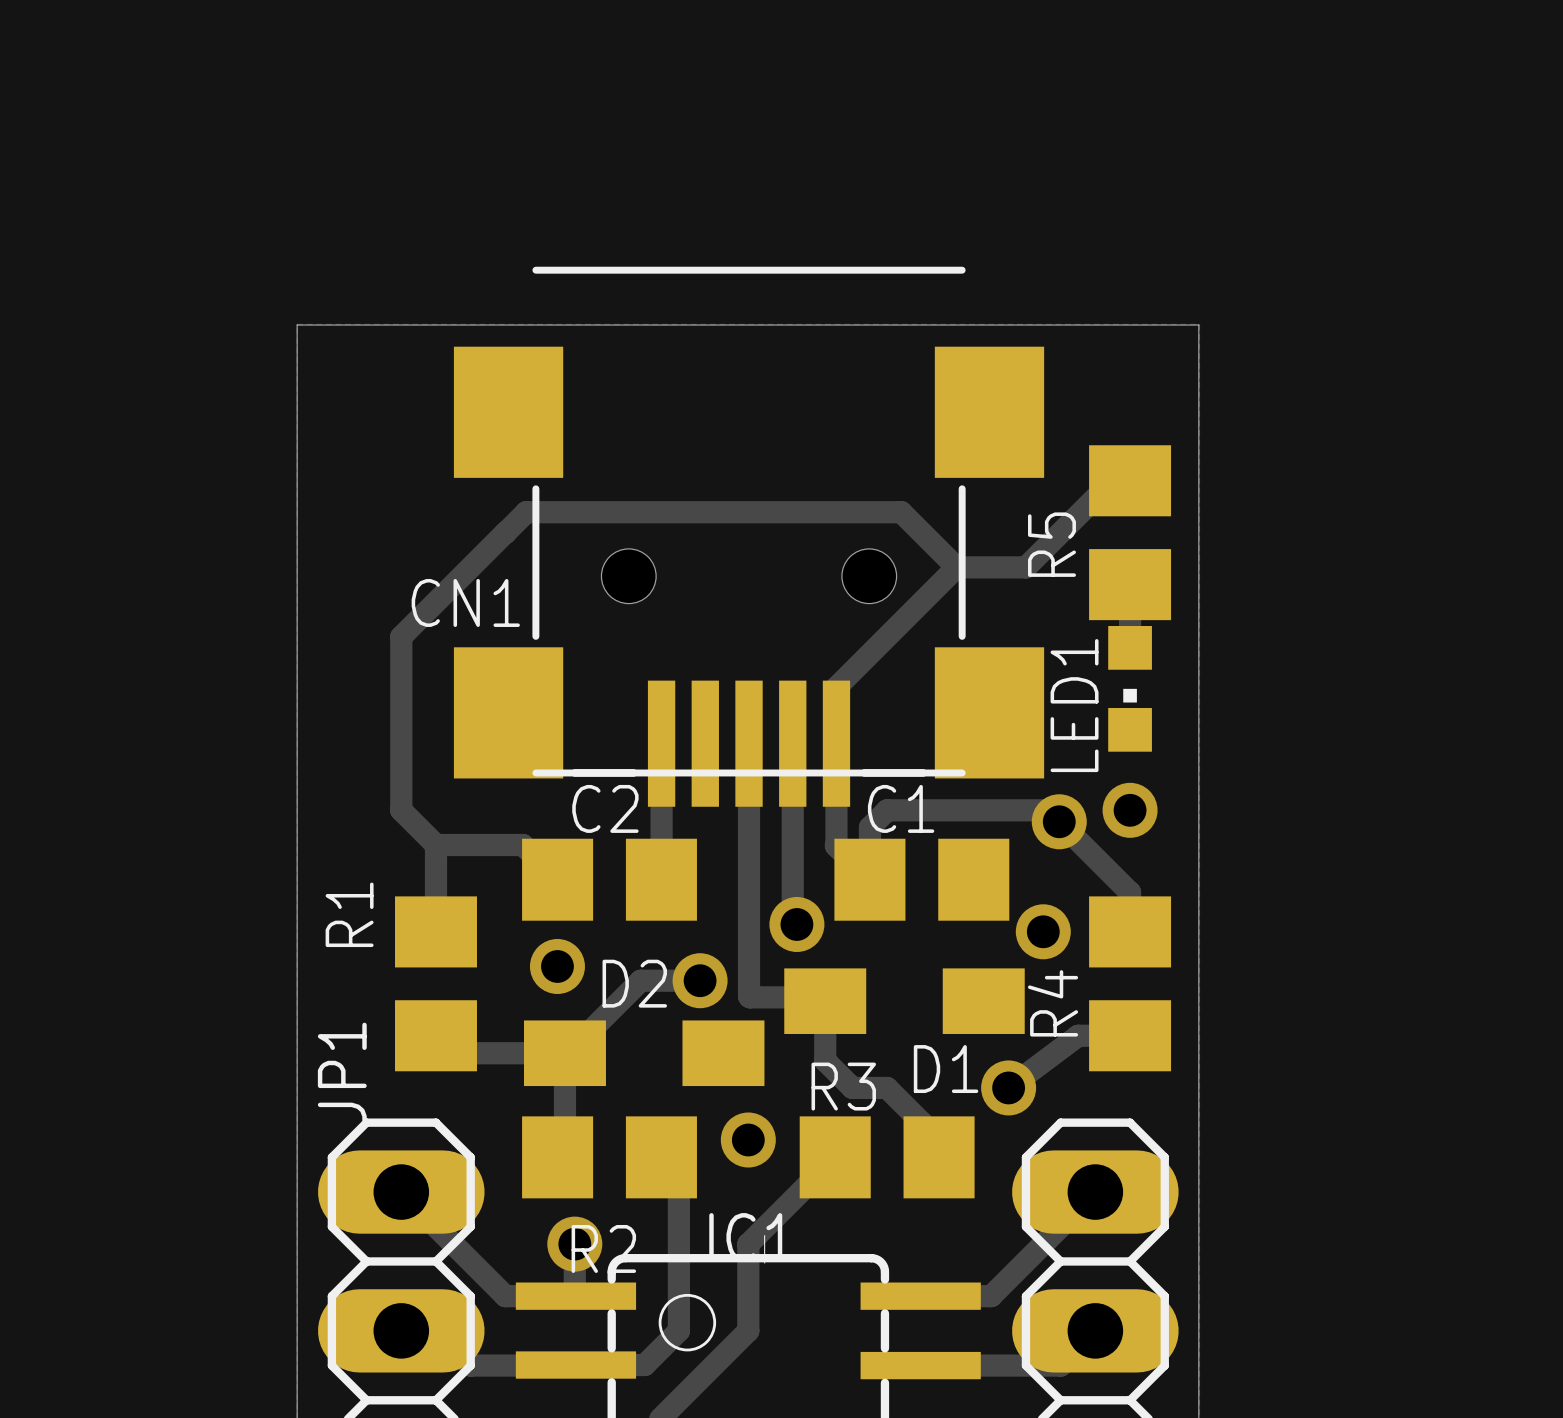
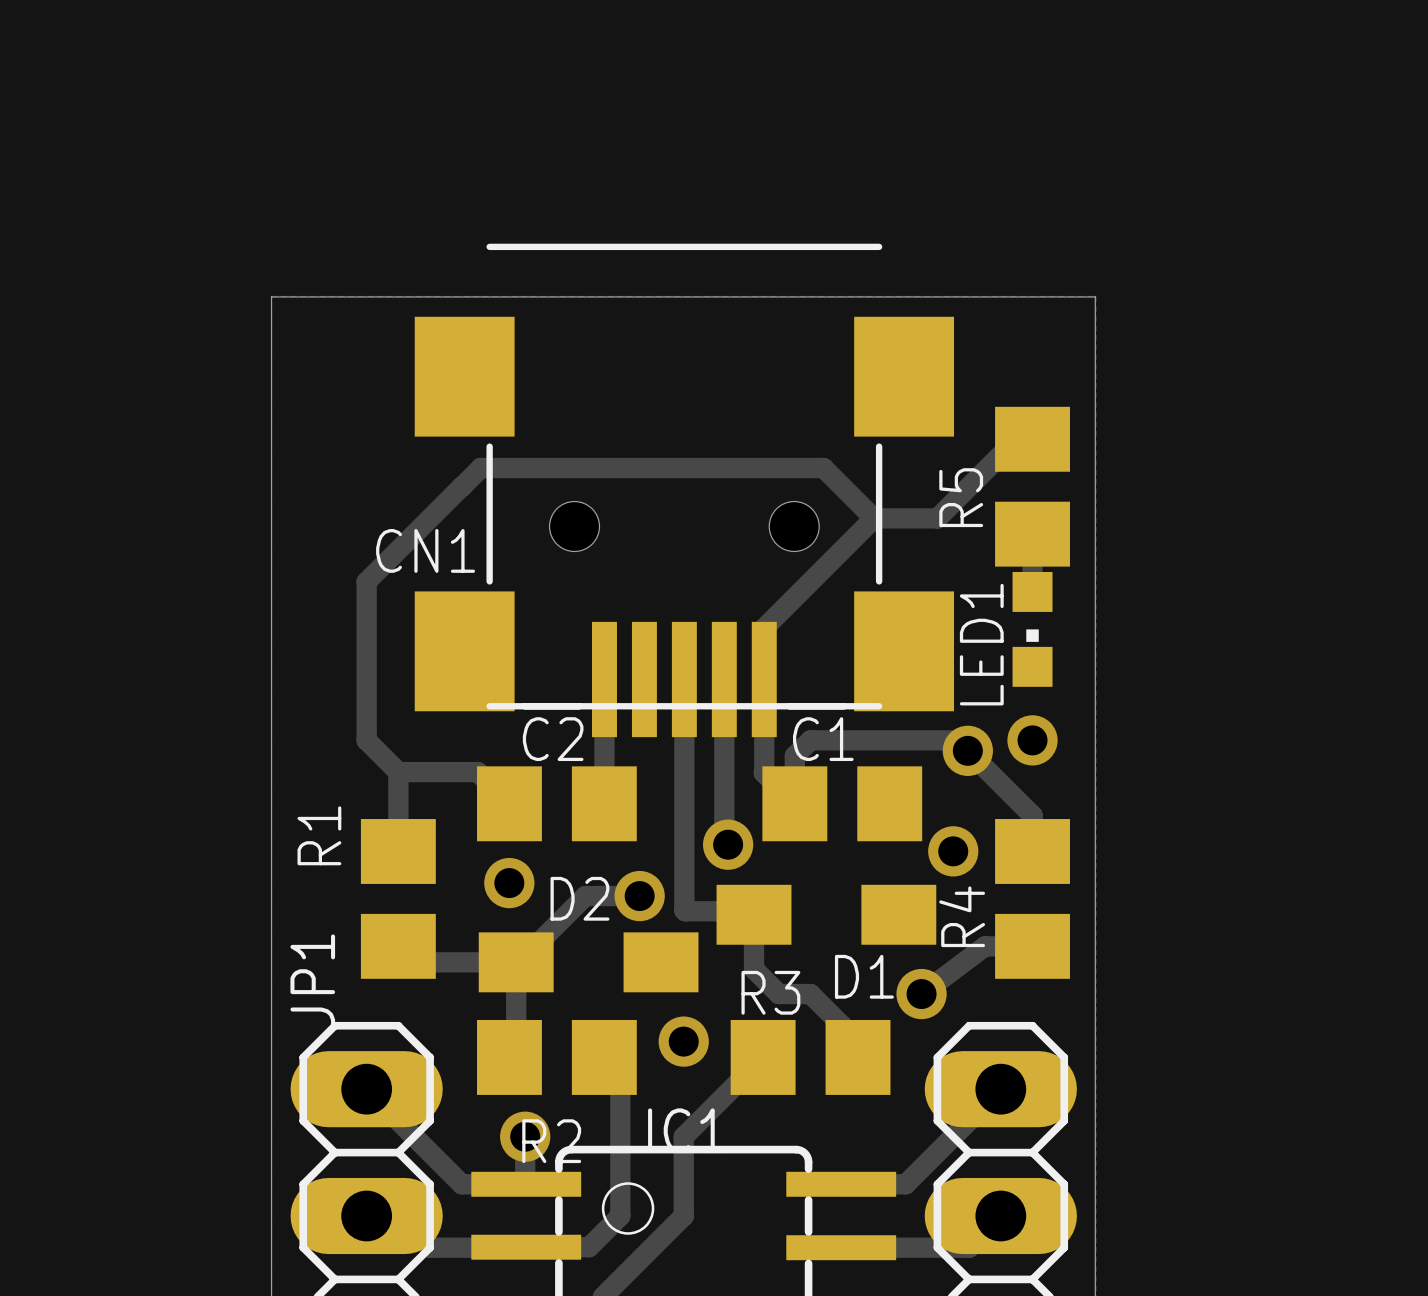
drawing: [764, 1235, 766, 1264] -> none

